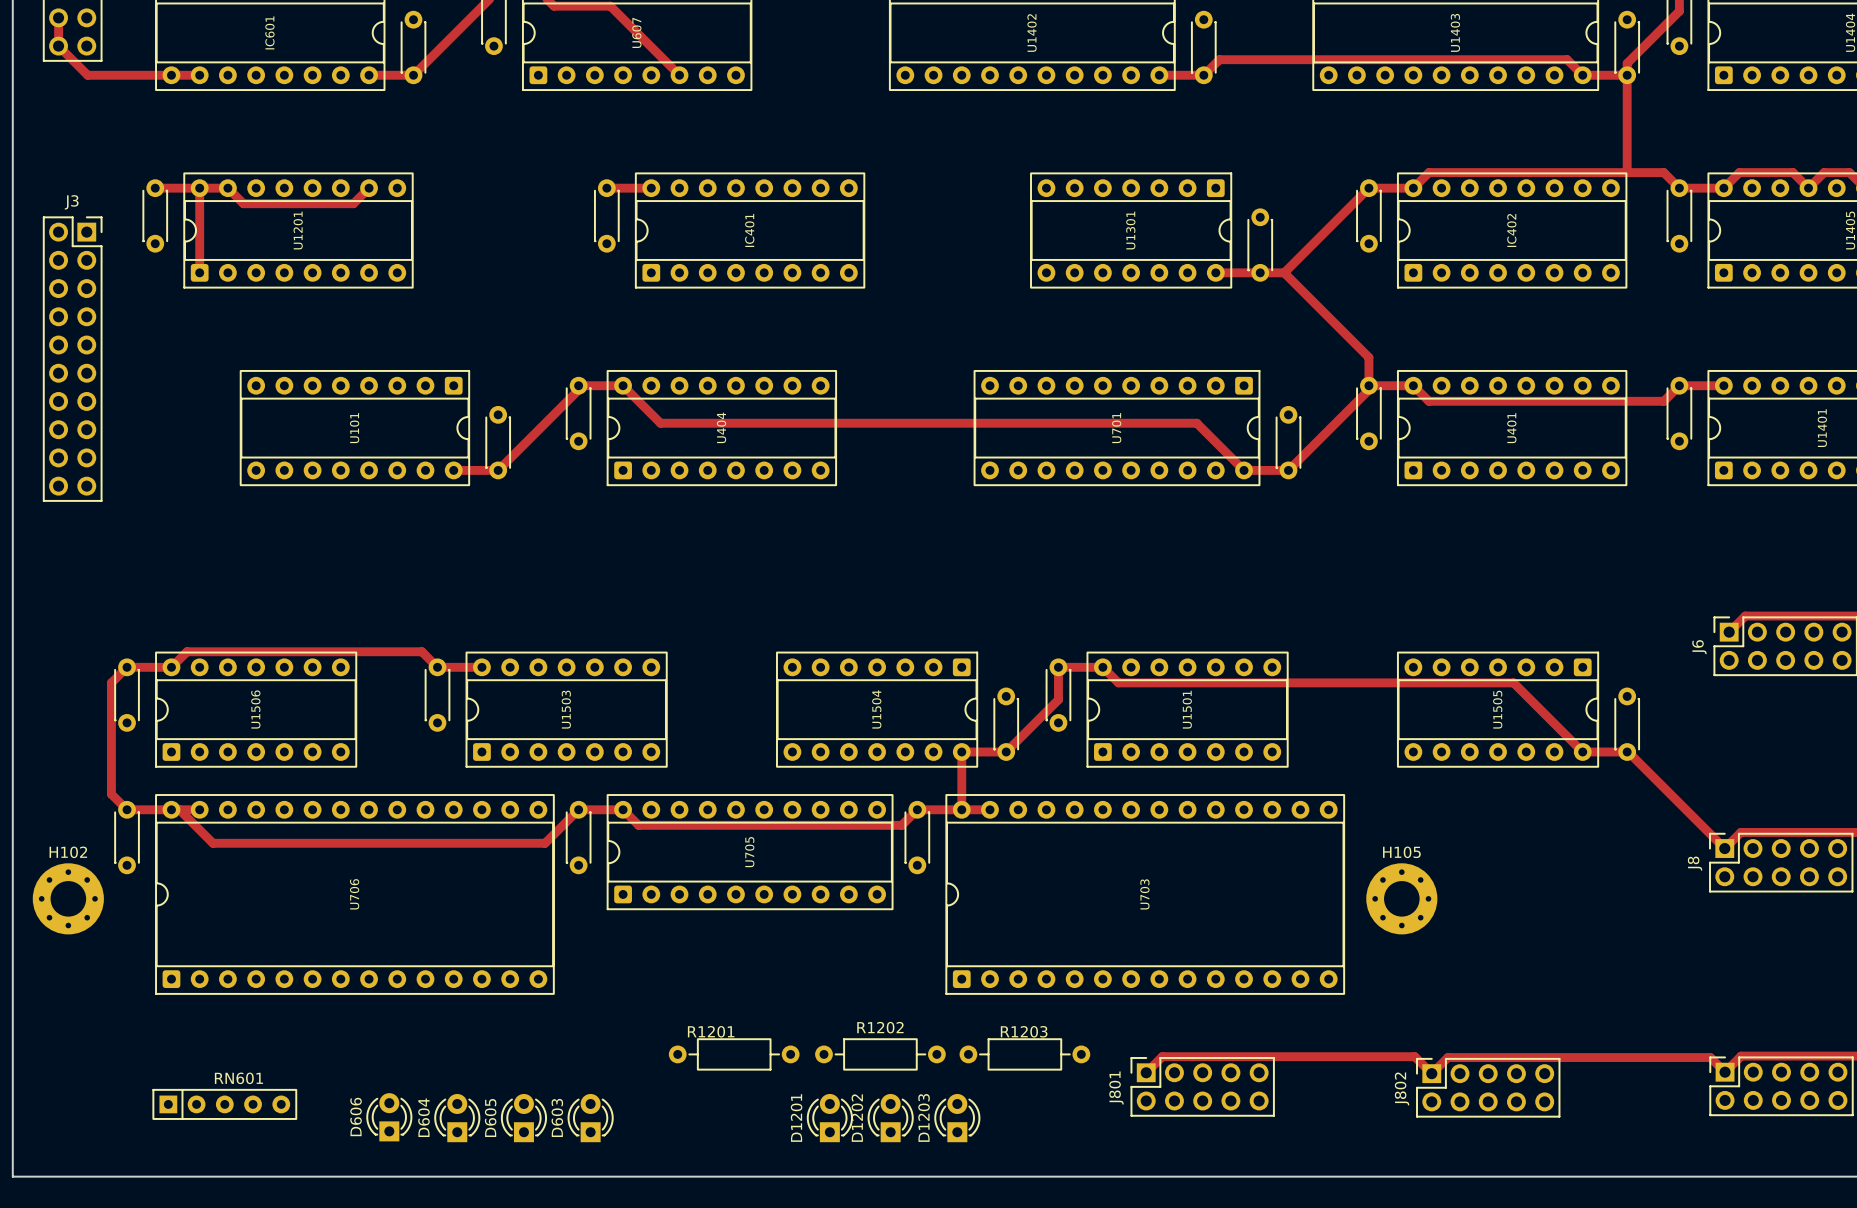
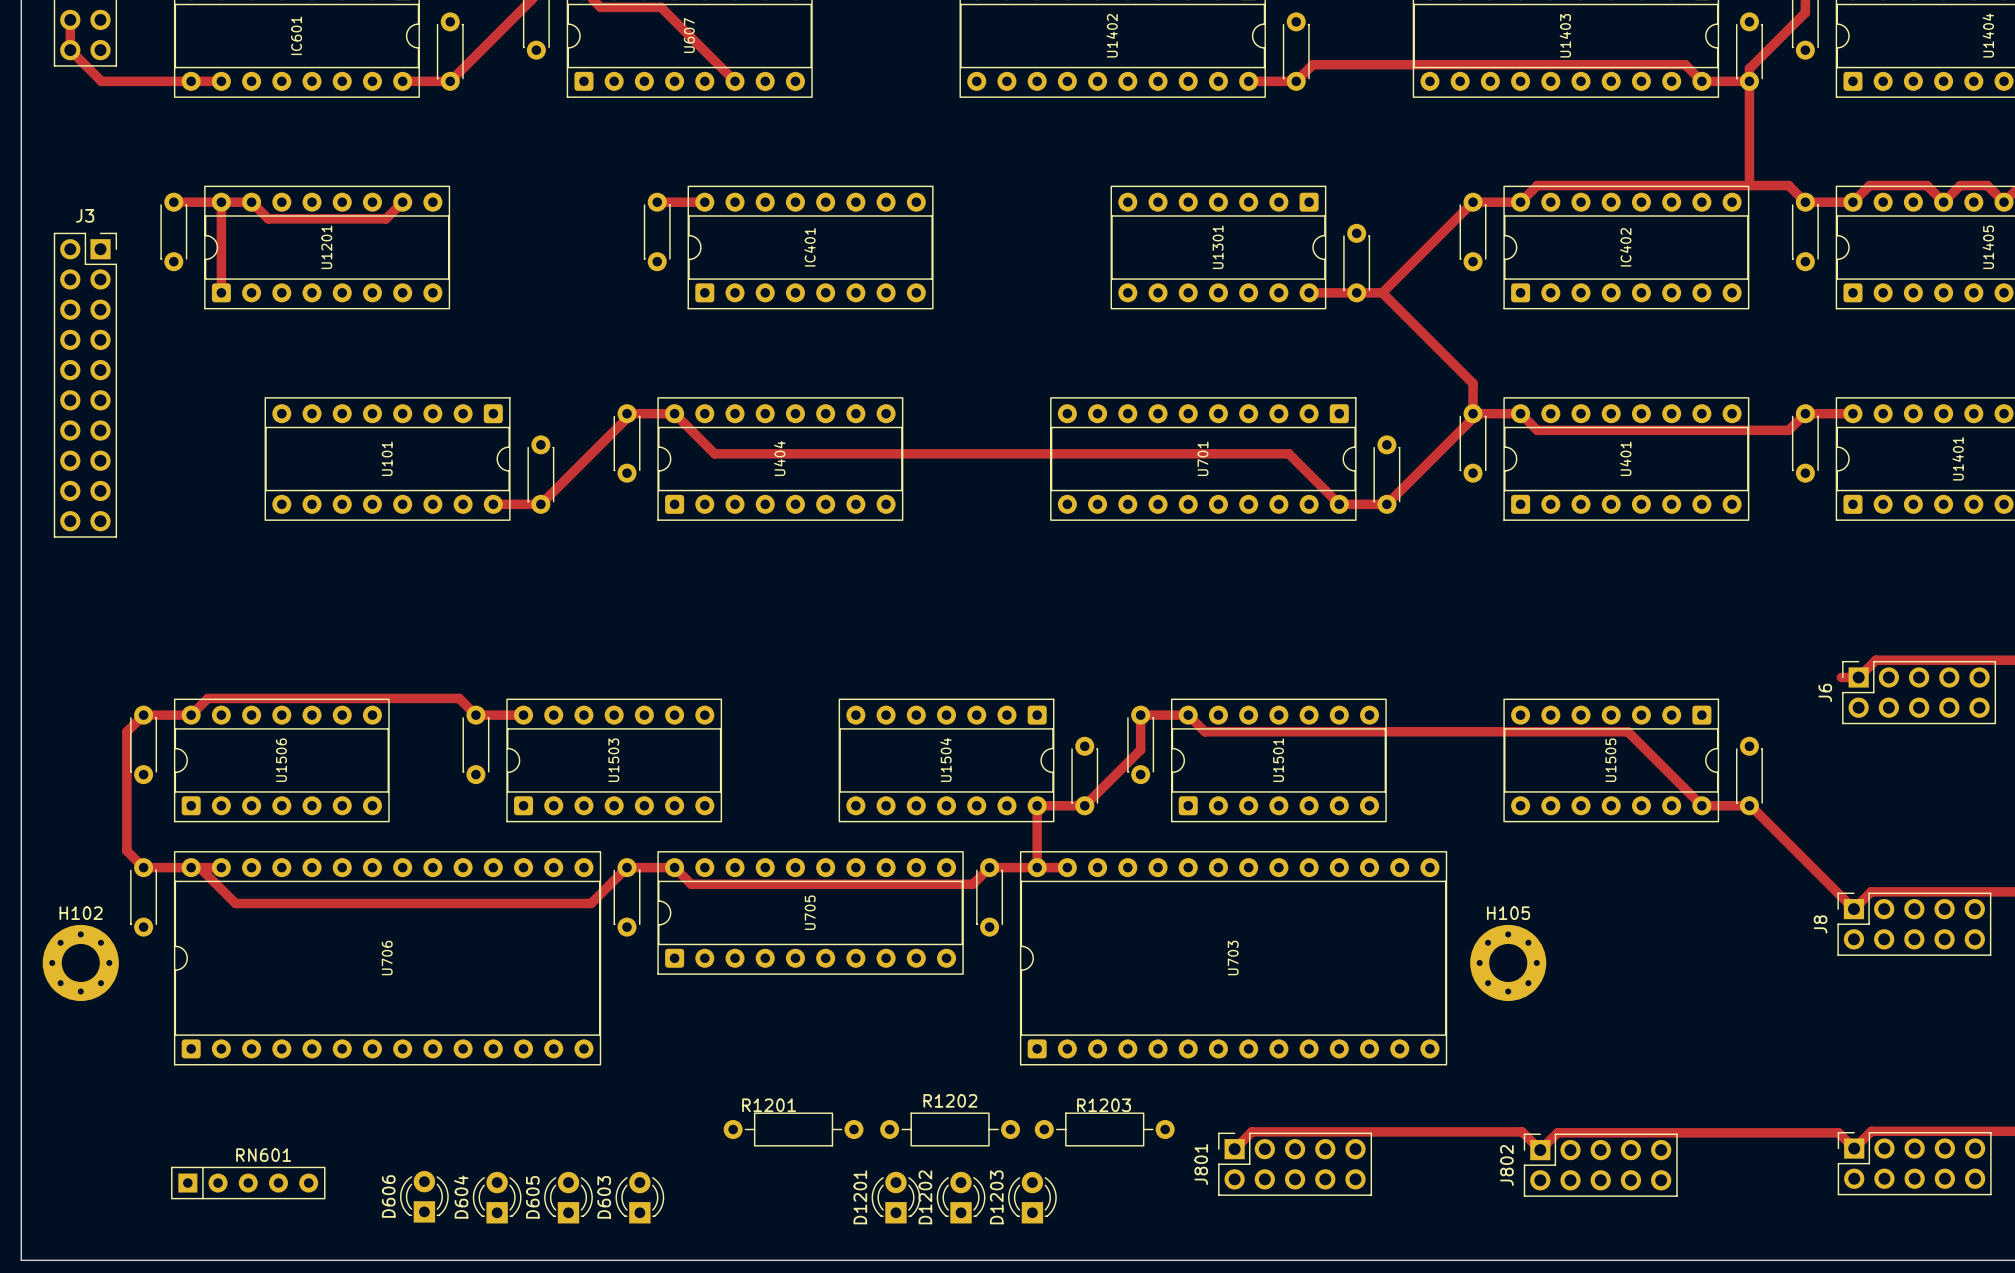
track: none -> (1841, 677) (1858, 677)

